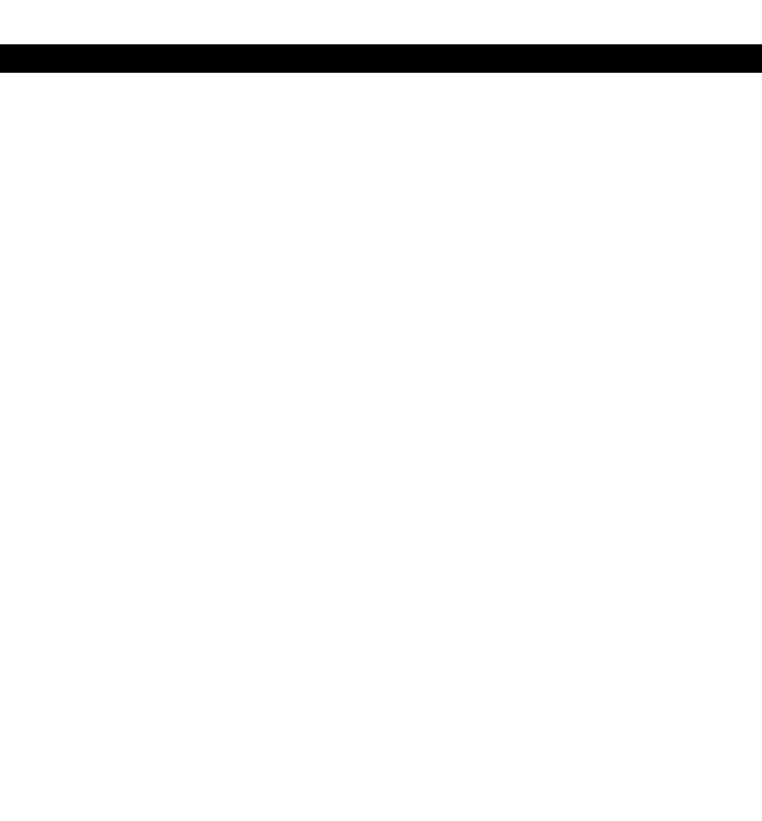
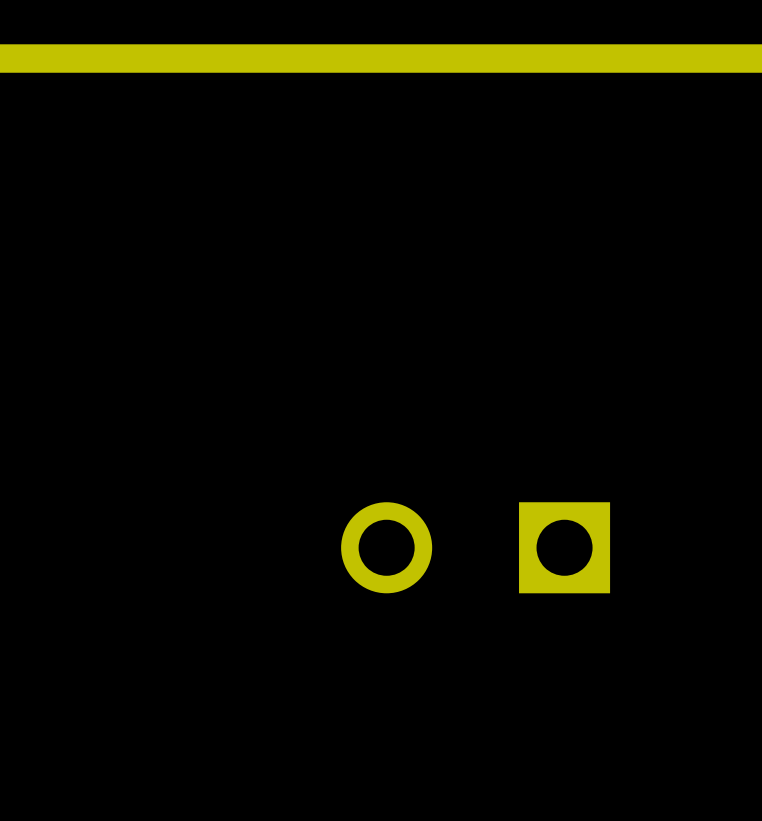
part: none -> (475, 547)

